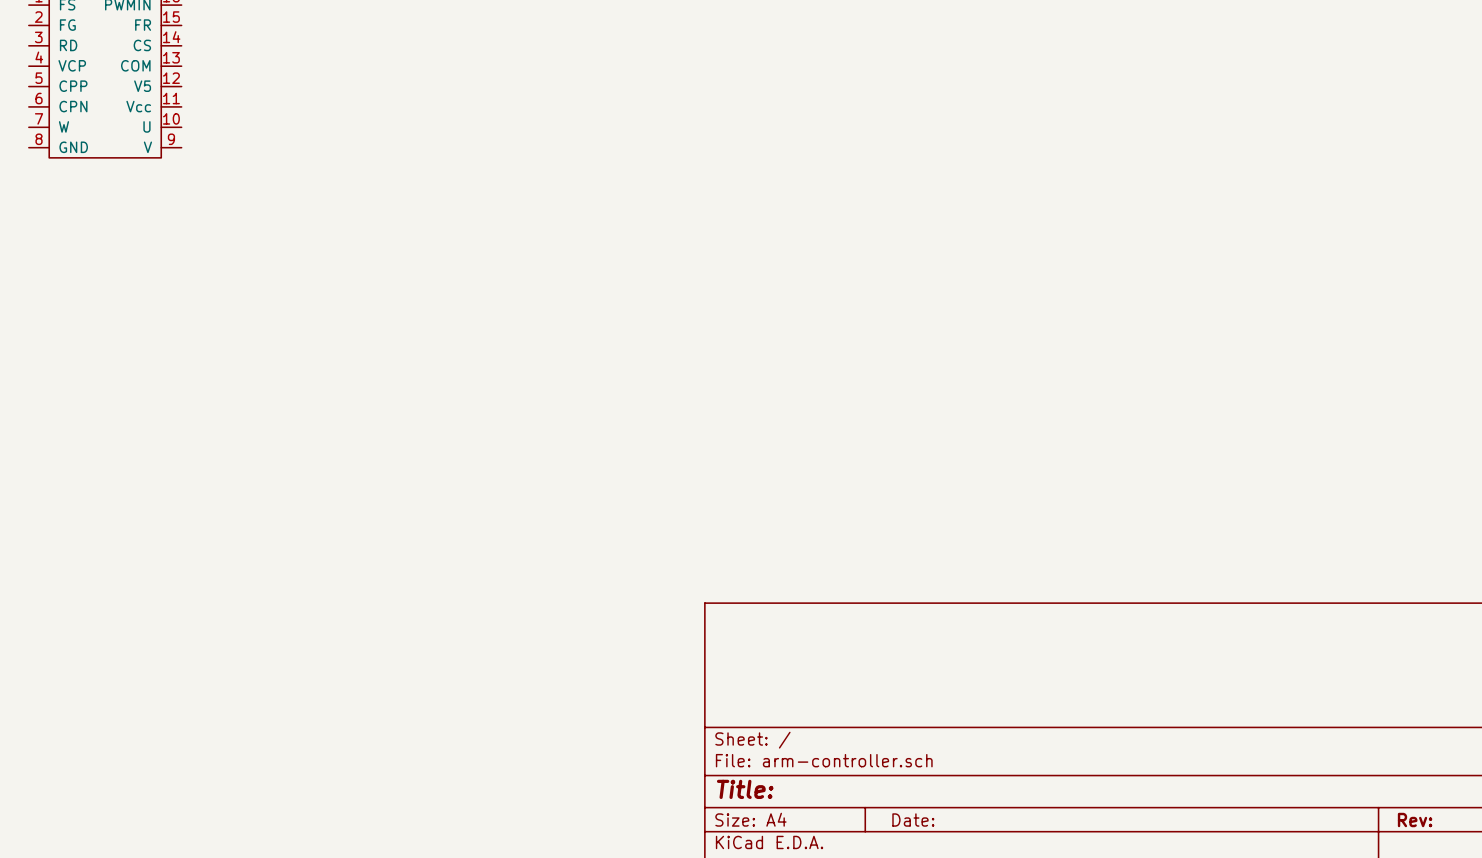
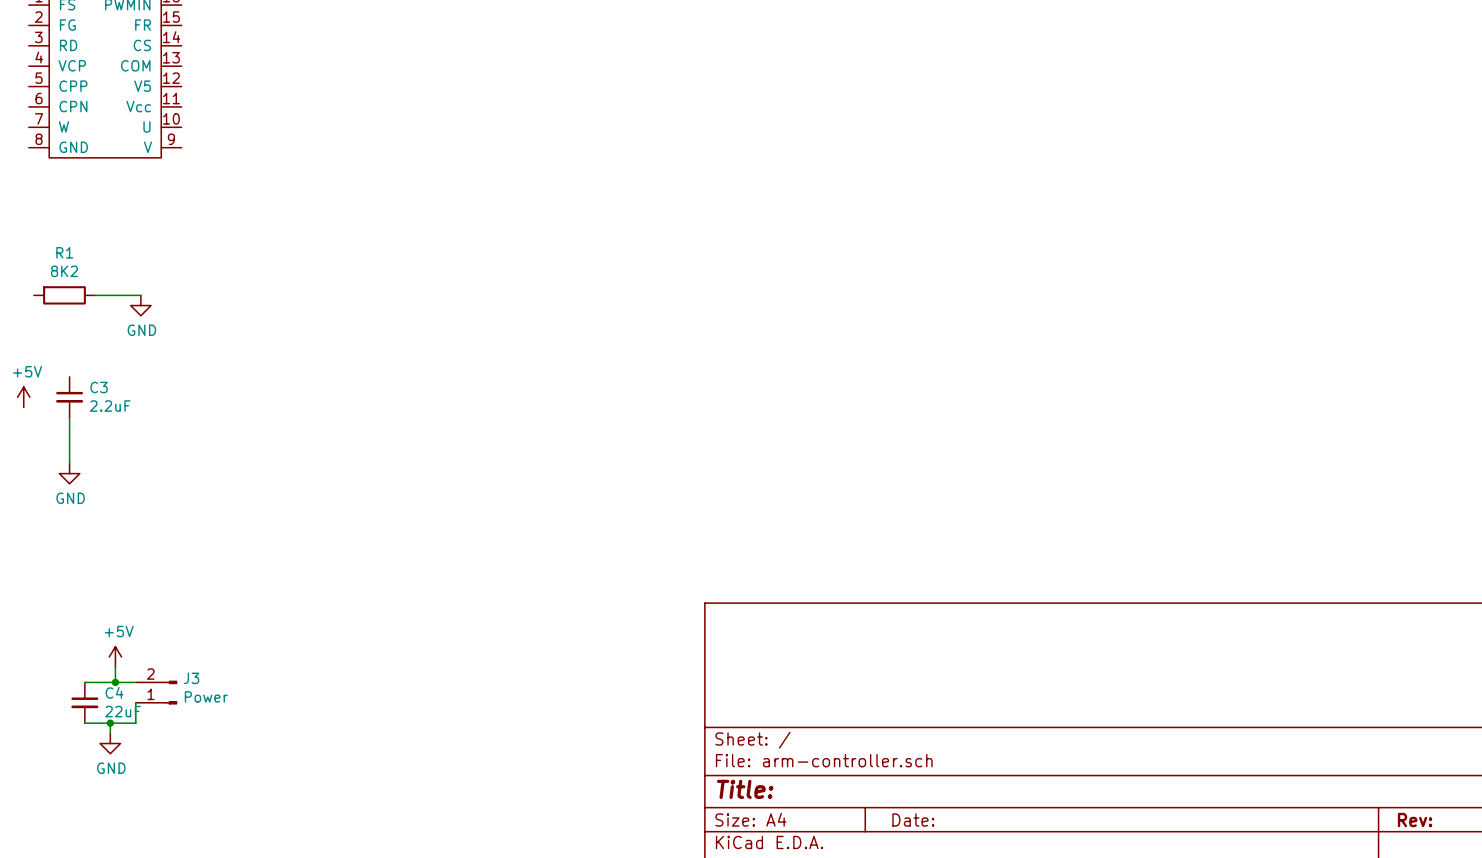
R1: none -> 8K2 (64, 295)
wire: none -> (95, 295) (140, 295)
power symbol: none -> GND (140, 305)
power symbol: none -> +5V (23, 397)
C3: none -> 2.2uF (69, 397)
wire: none -> (69, 417) (69, 463)
power symbol: none -> GND (69, 473)
power symbol: none -> +5V (115, 656)
wire: none -> (115, 667) (115, 682)
wire: none -> (84, 682) (135, 682)
junction: none -> (115, 682)
J3: none -> Power (156, 692)
C4: none -> 22uF (84, 702)
wire: none -> (135, 702) (135, 723) (84, 723)
wire: none -> (110, 723) (110, 733)
junction: none -> (110, 723)
power symbol: none -> GND (110, 743)

